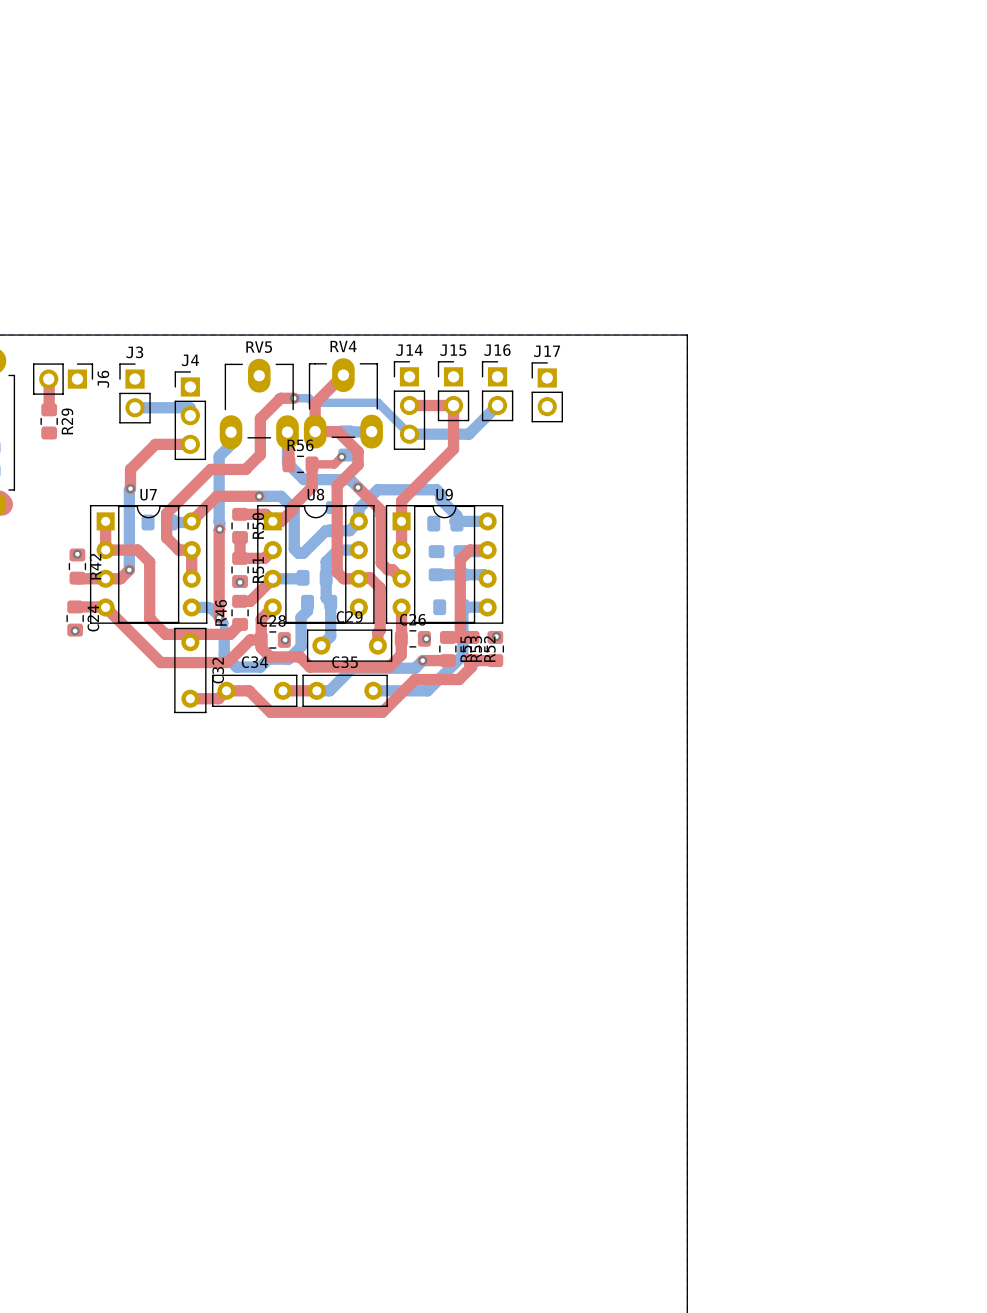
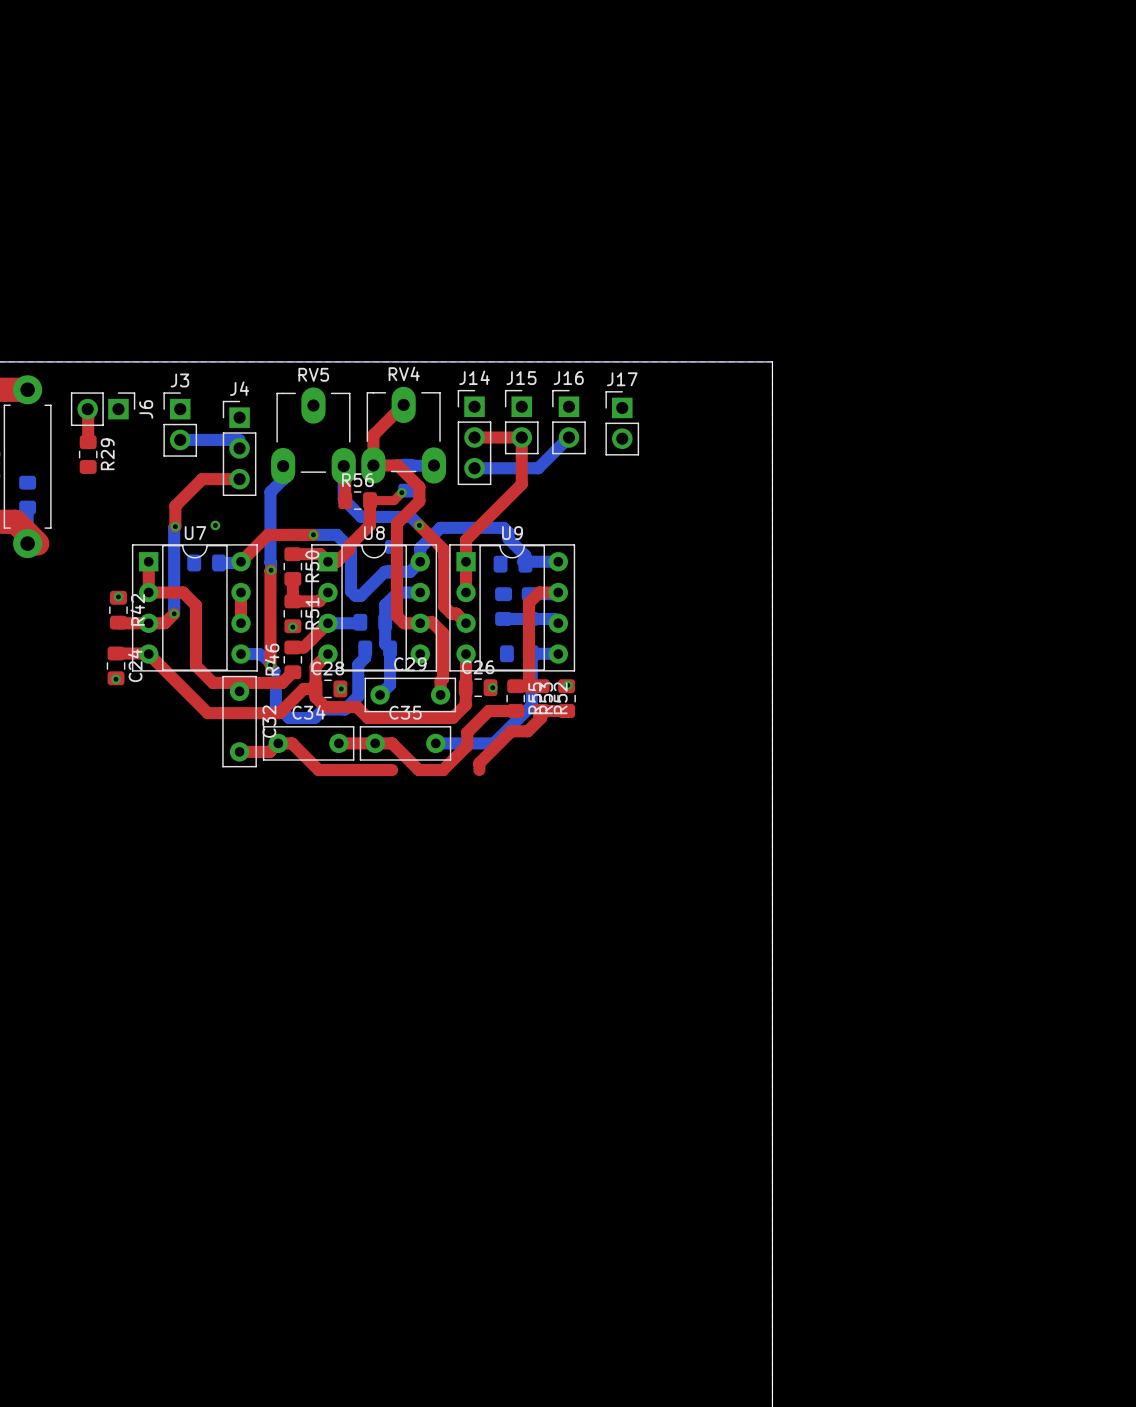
bottom track: (294, 398) (308, 398) (313, 402) (378, 402) (409, 434) -> none
top track: (294, 398) (280, 398) (260, 418) (260, 454) (245, 469) (210, 469) (166, 513) (166, 537) (178, 550) (191, 550) -> none
via: (294, 398) -> none
via: none -> (215, 525)
bottom track: (422, 660) (415, 668) (352, 668) (329, 690) (316, 690) -> none
top track: none -> (488, 711) (467, 732) (467, 745) (443, 770) (418, 770) (392, 743) (375, 743)
via: (422, 660) -> none
top track: (443, 679) (415, 679) (382, 712) (270, 712) (249, 690) (239, 690) -> (392, 770) (318, 770) (292, 743)
top track: none -> (511, 731) (479, 763) (479, 770)

